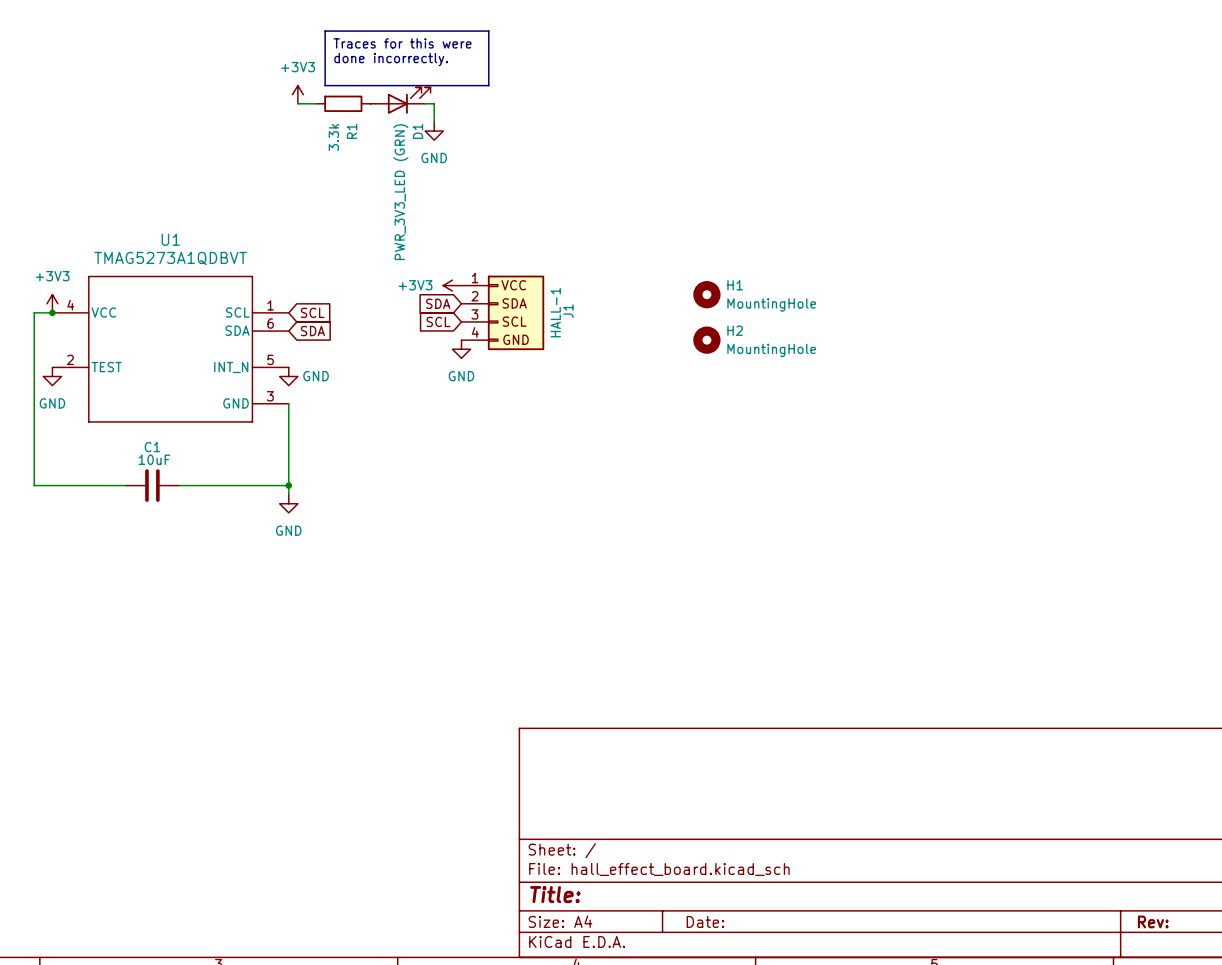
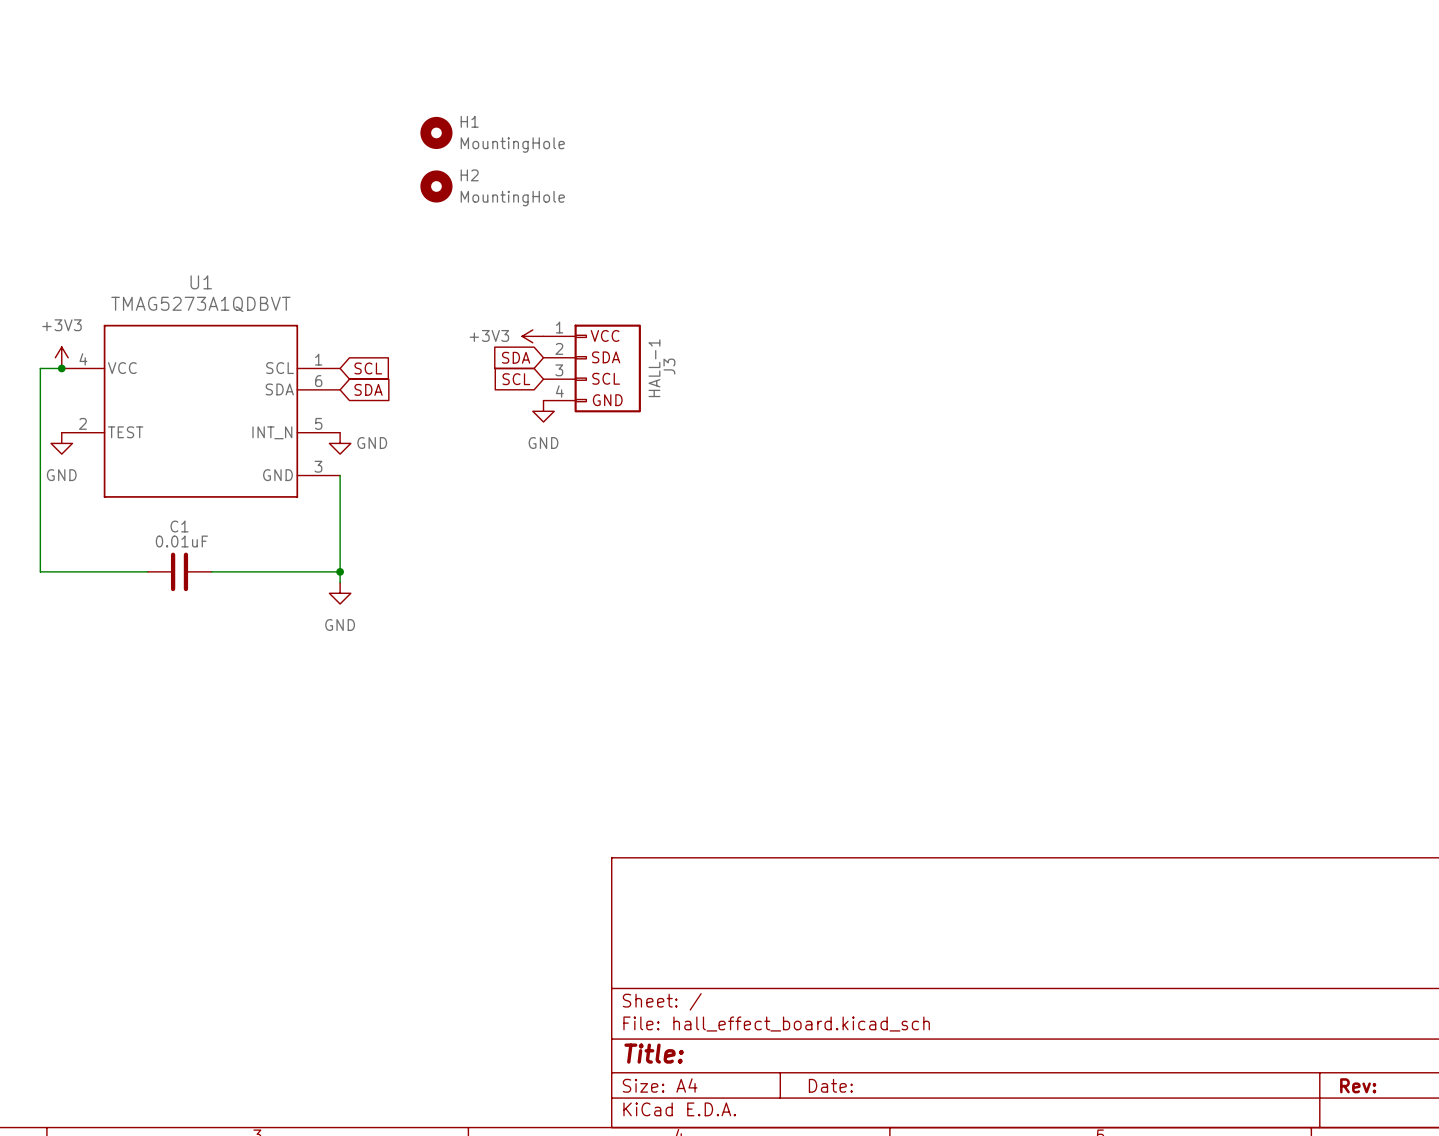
line: (325, 31) (488, 31) (488, 85) (325, 85) (325, 31) -> none
text: Traces for this were (402, 43) -> none
text: done incorrectly. (391, 59) -> none
power symbol: +3V3 (297, 94) -> none
D1: PWR_3V3_LED (GRN) (400, 100) -> none
wire: (297, 103) (316, 103) -> none
R1: 3.3k (343, 103) -> none
wire: (425, 103) (434, 103) (434, 121) -> none
power symbol: GND (434, 131) -> none
H1 position: (706, 294) -> (436, 132)
J1 name: J1 (568, 311) -> J3 (669, 366)
H2 position: (706, 340) -> (436, 186)
C1 value: 10uF (154, 459) -> 0.01uF (181, 541)

